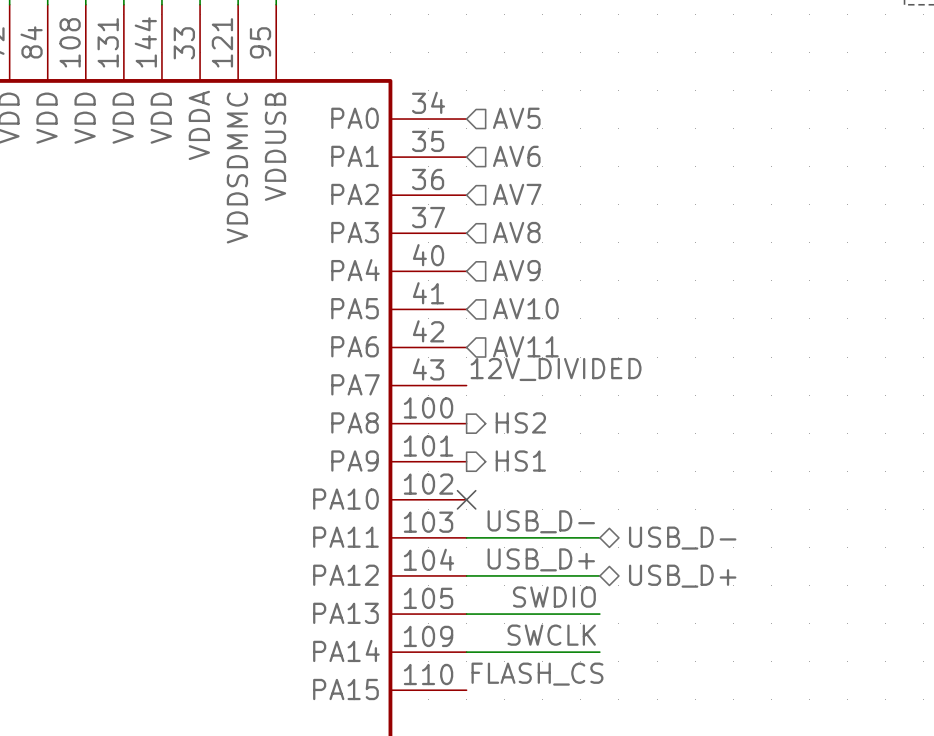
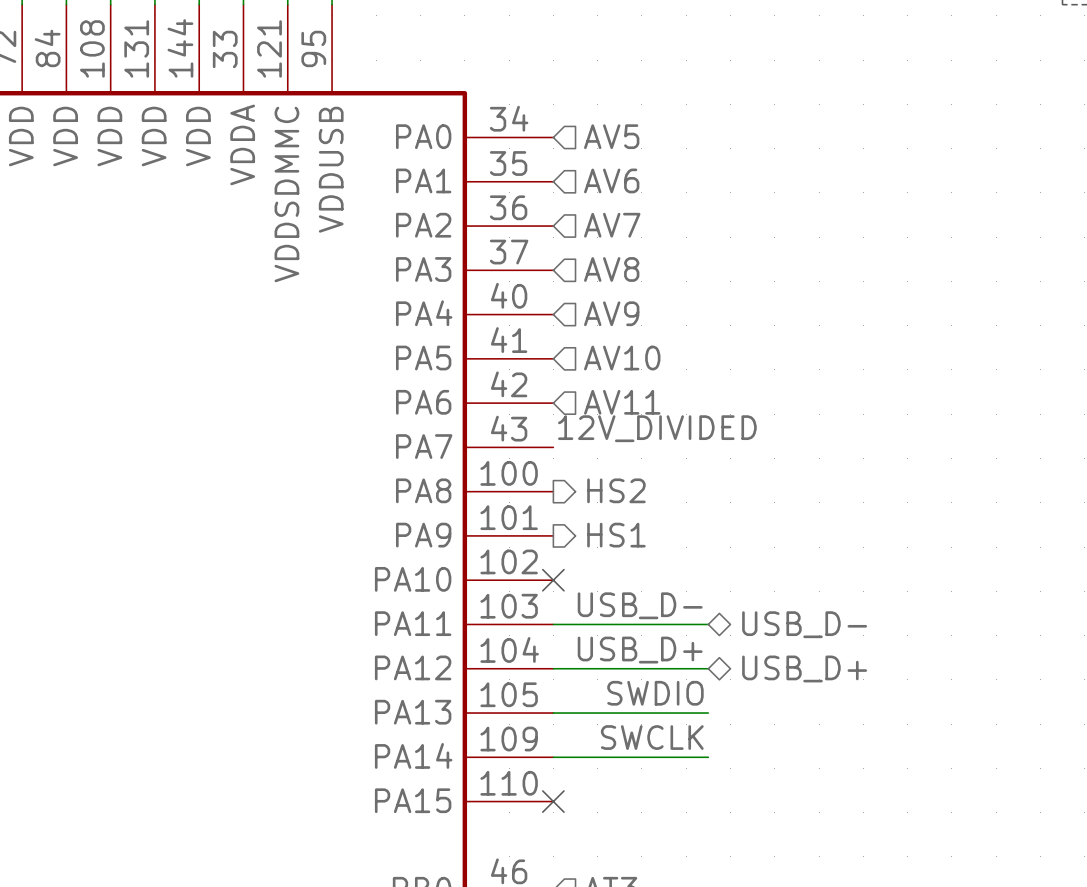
label: FLASH_CS (537, 674) -> none
no-connect mark: none -> (553, 801)

